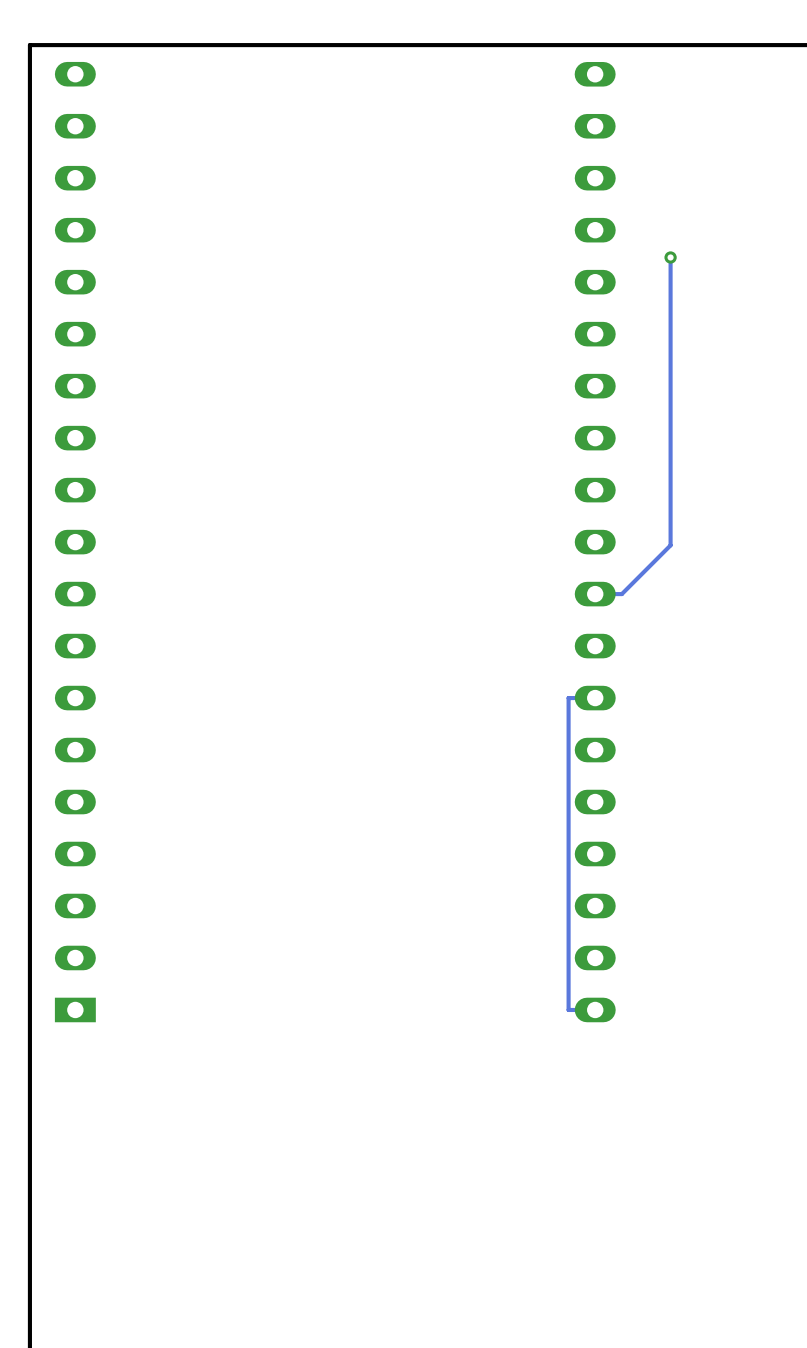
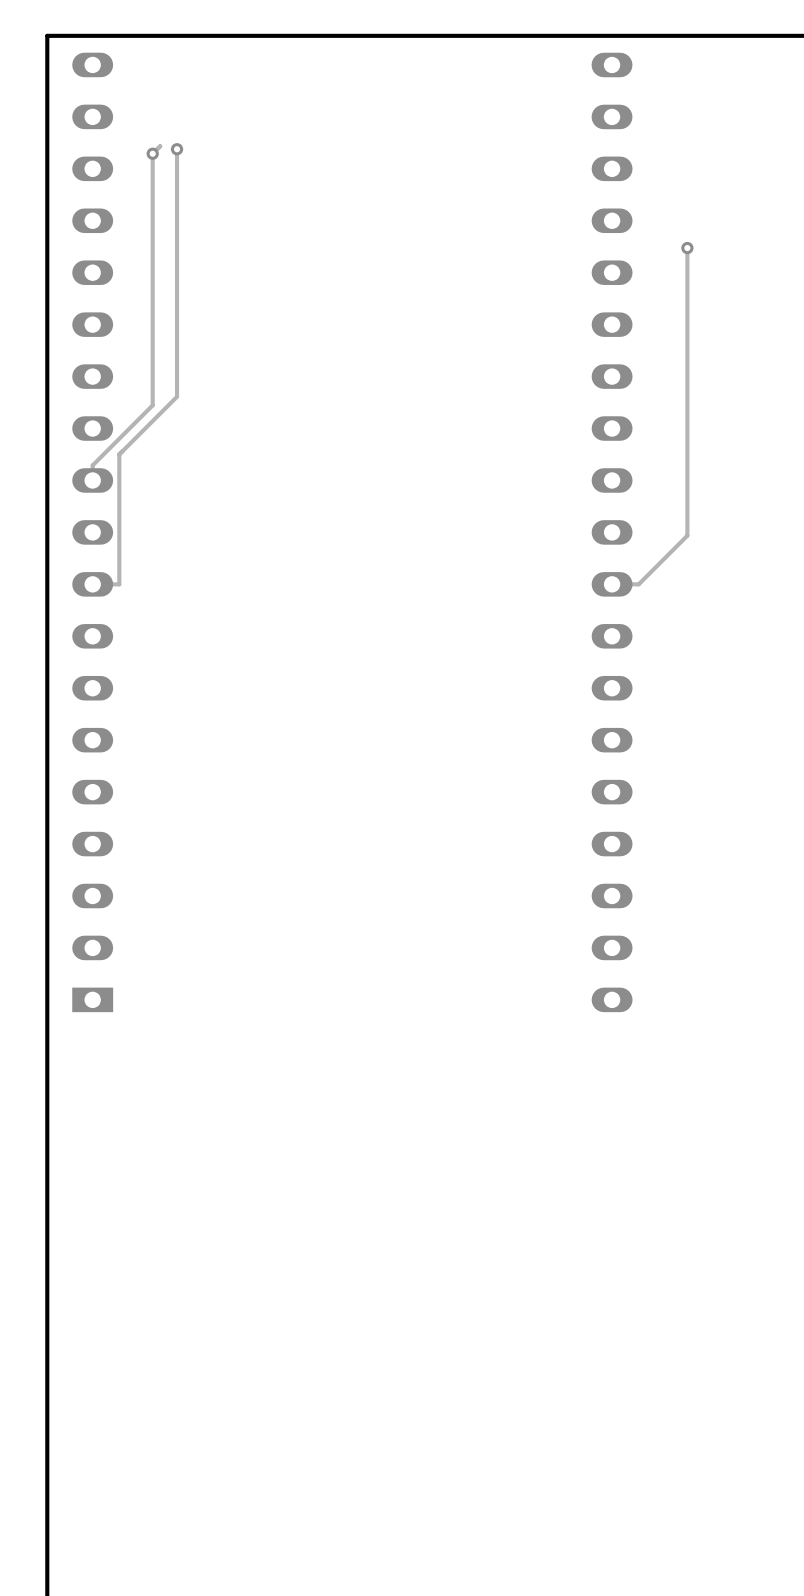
track: none -> (160, 146) (152, 153) (152, 405) (92, 465) (92, 480)
track: none -> (177, 149) (177, 396) (119, 454) (119, 584) (92, 584)
via: none -> (177, 149)
via: none -> (152, 153)
track: (595, 698) (568, 698) (568, 1009) (595, 1009) -> none

